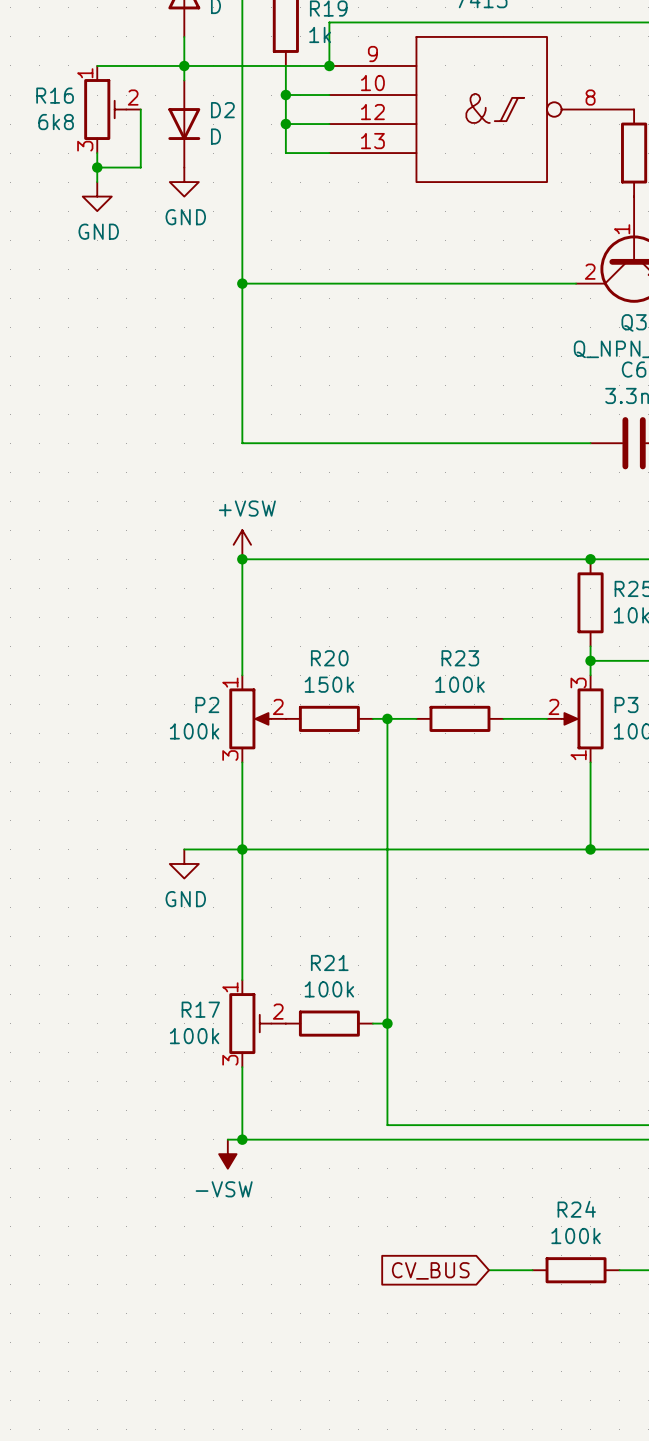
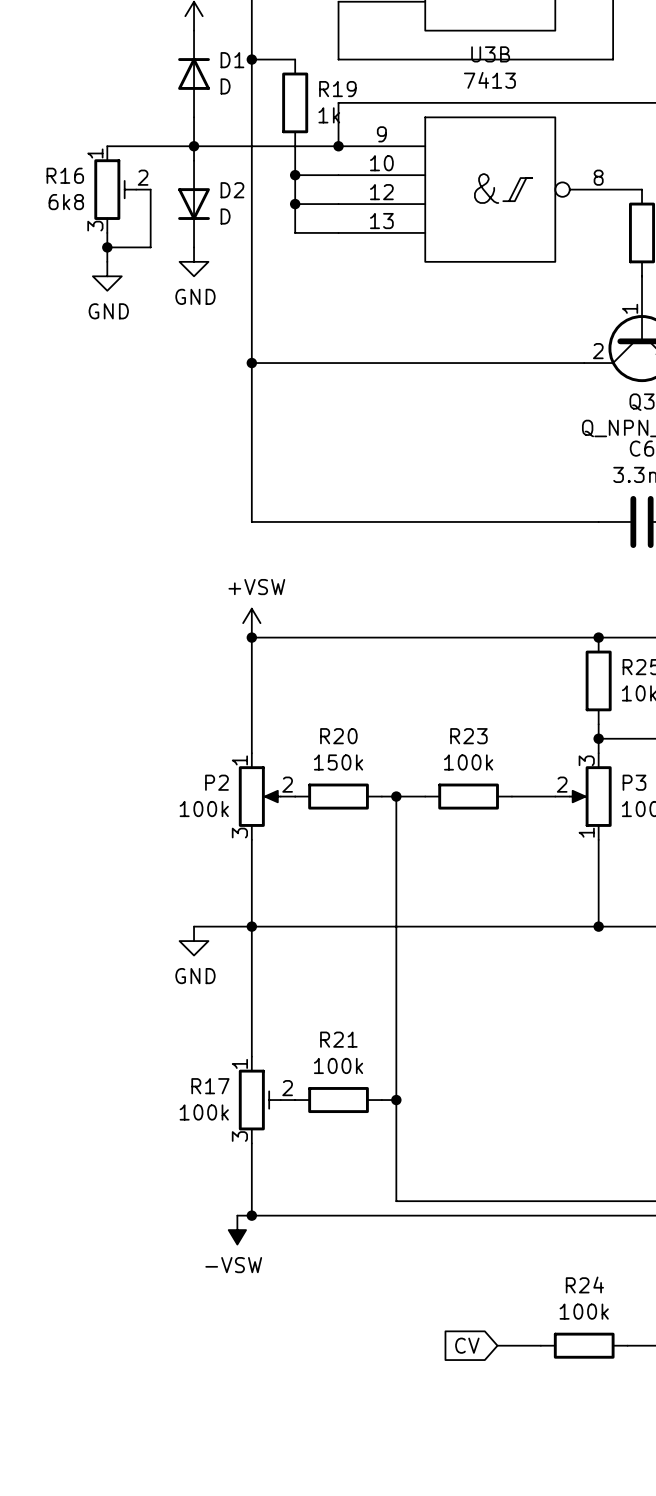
global label: CV_BUS (430, 1270) -> CV (467, 1345)

